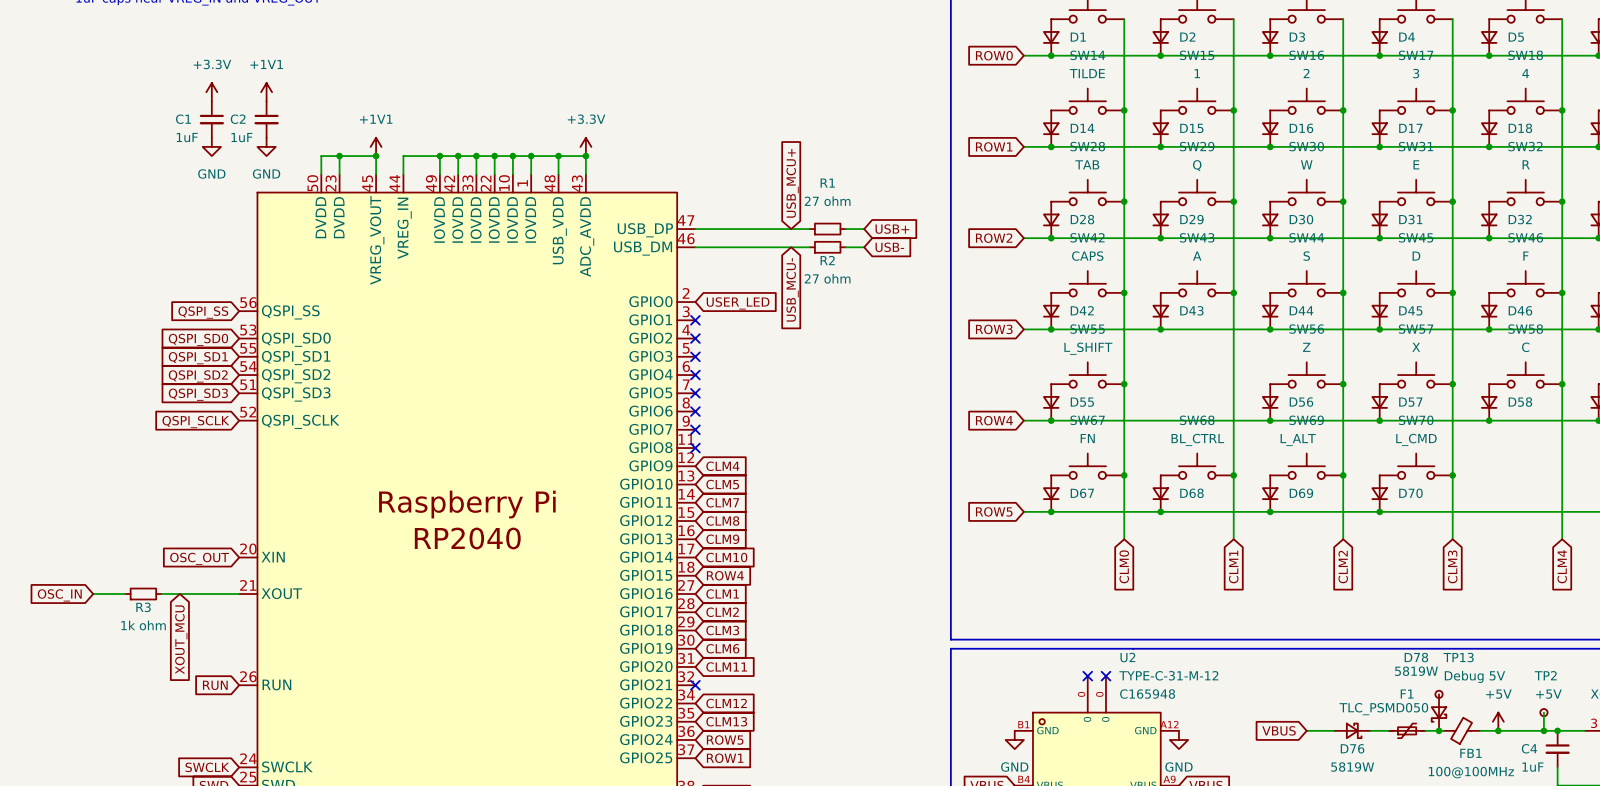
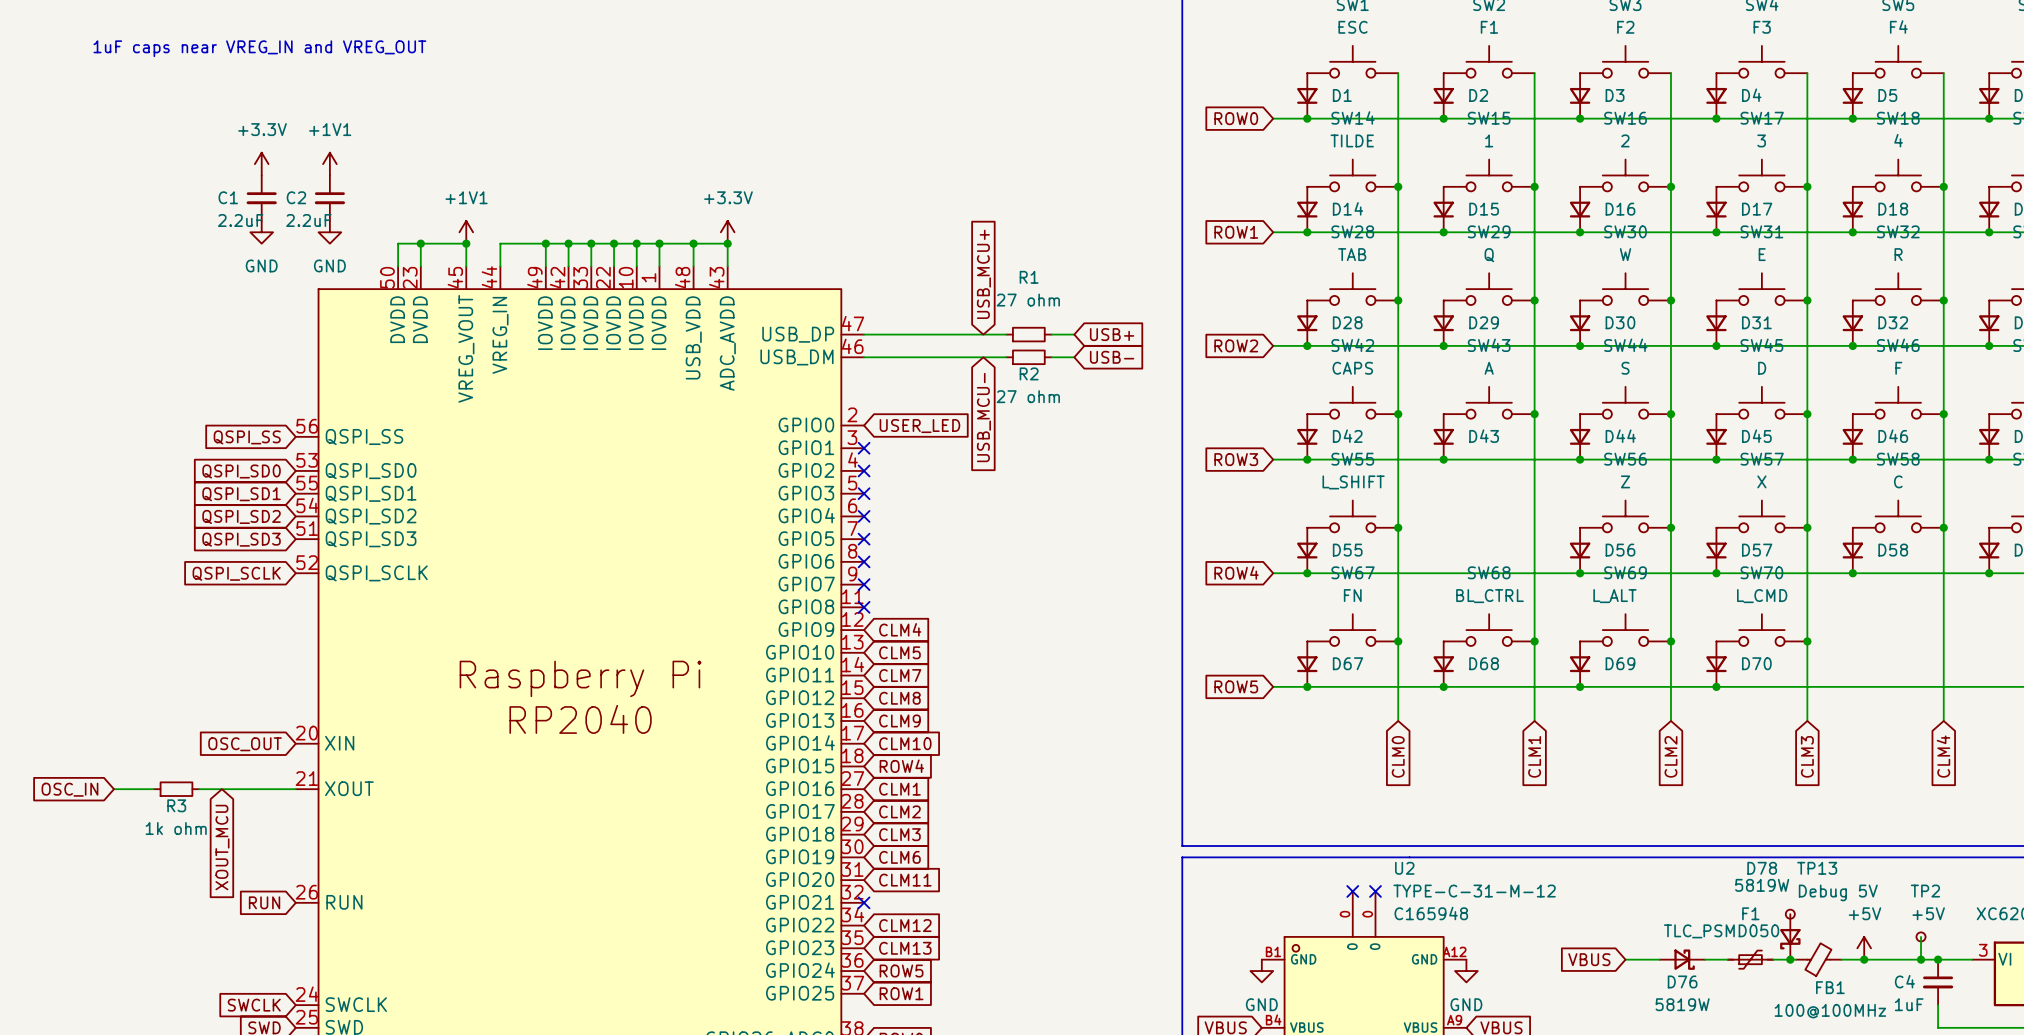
C1 value: 1uF (187, 137) -> 2.2uF (240, 220)
C2 value: 1uF (241, 137) -> 2.2uF (308, 220)

